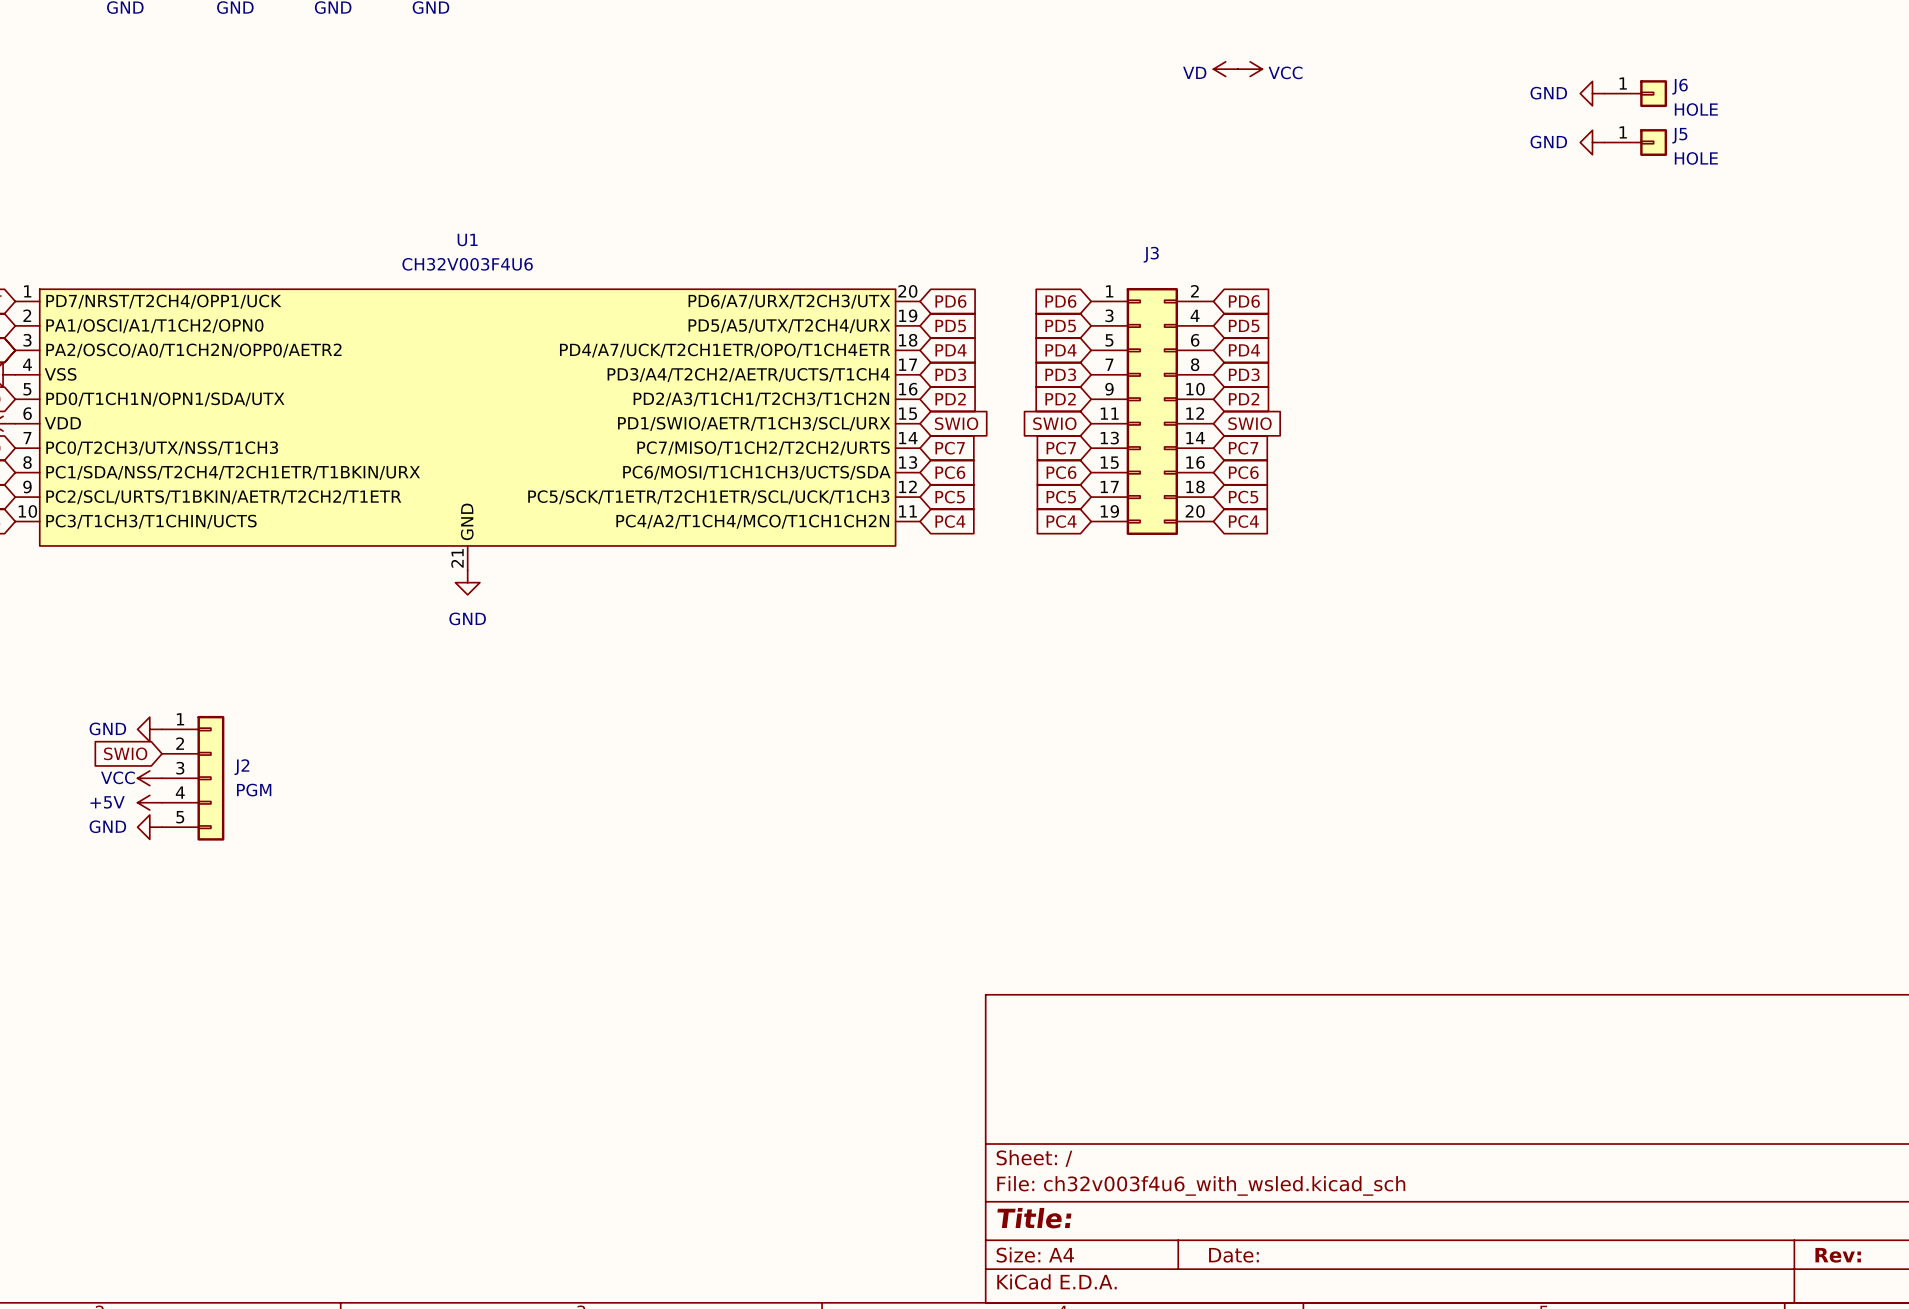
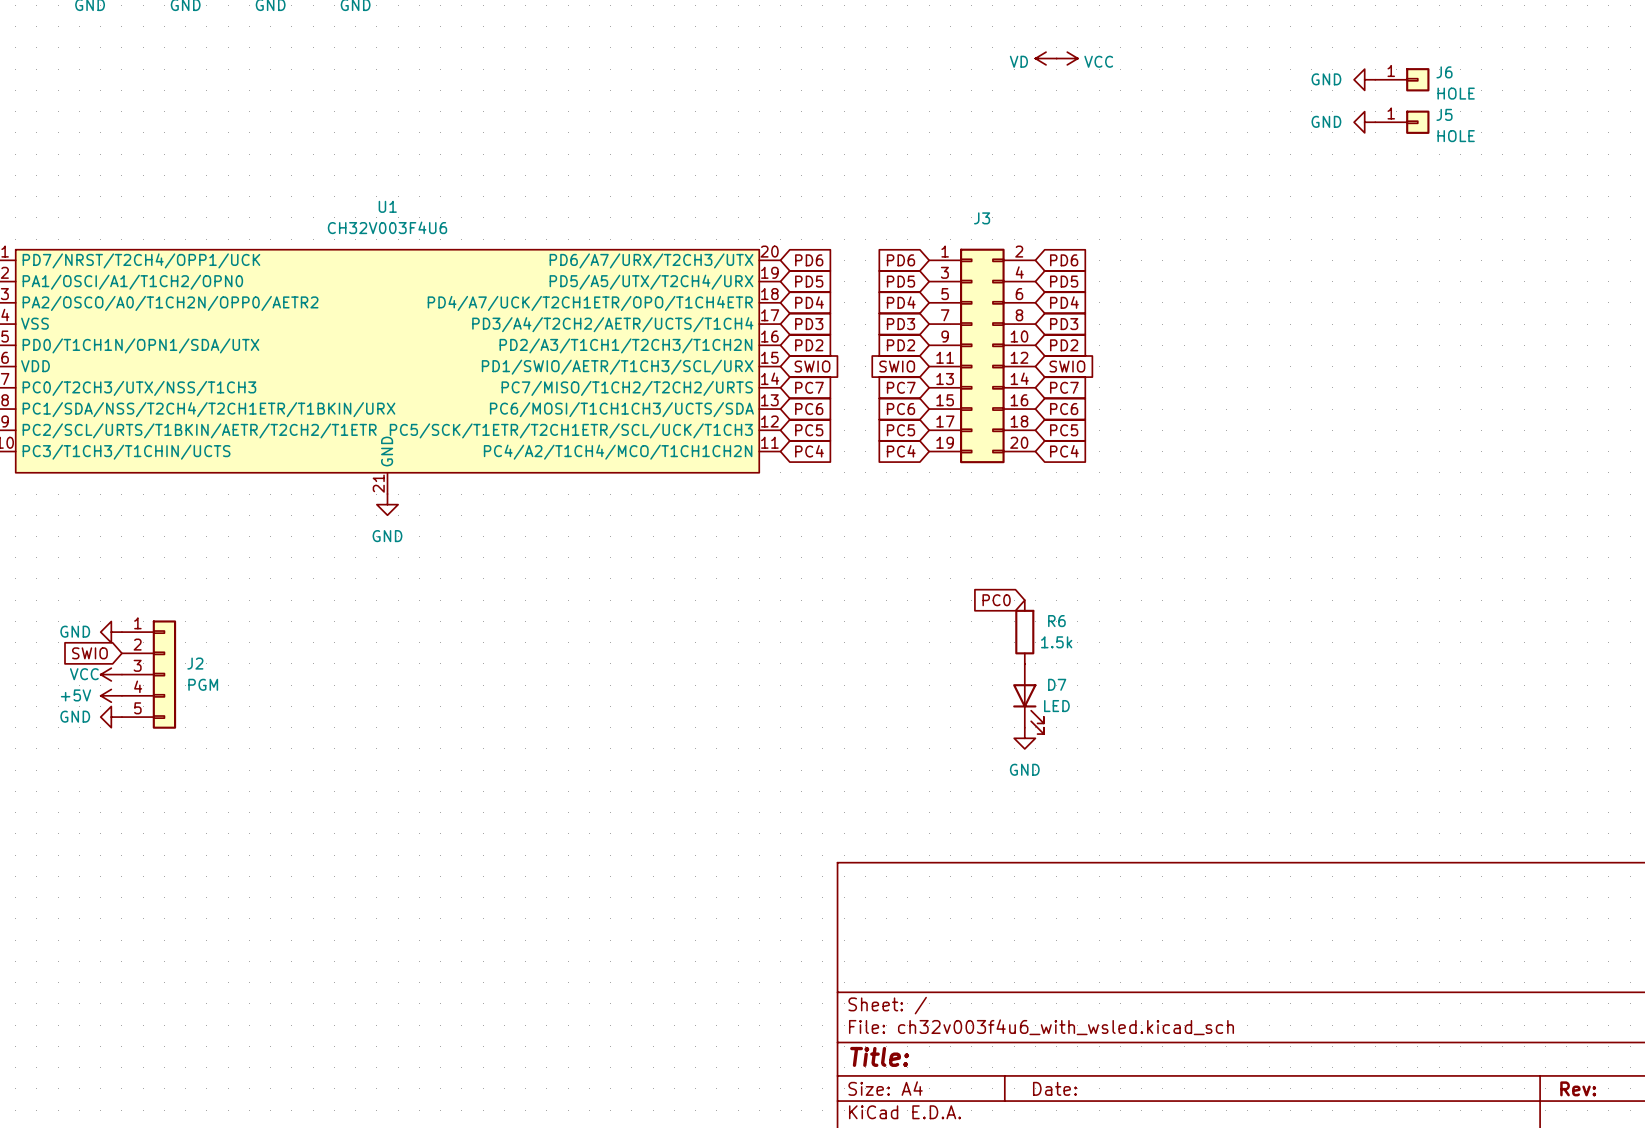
global label: none -> PC0 (996, 600)
R6: none -> 1.5k (1024, 632)
D7: none -> LED (1028, 699)
power symbol: none -> GND (1024, 738)

